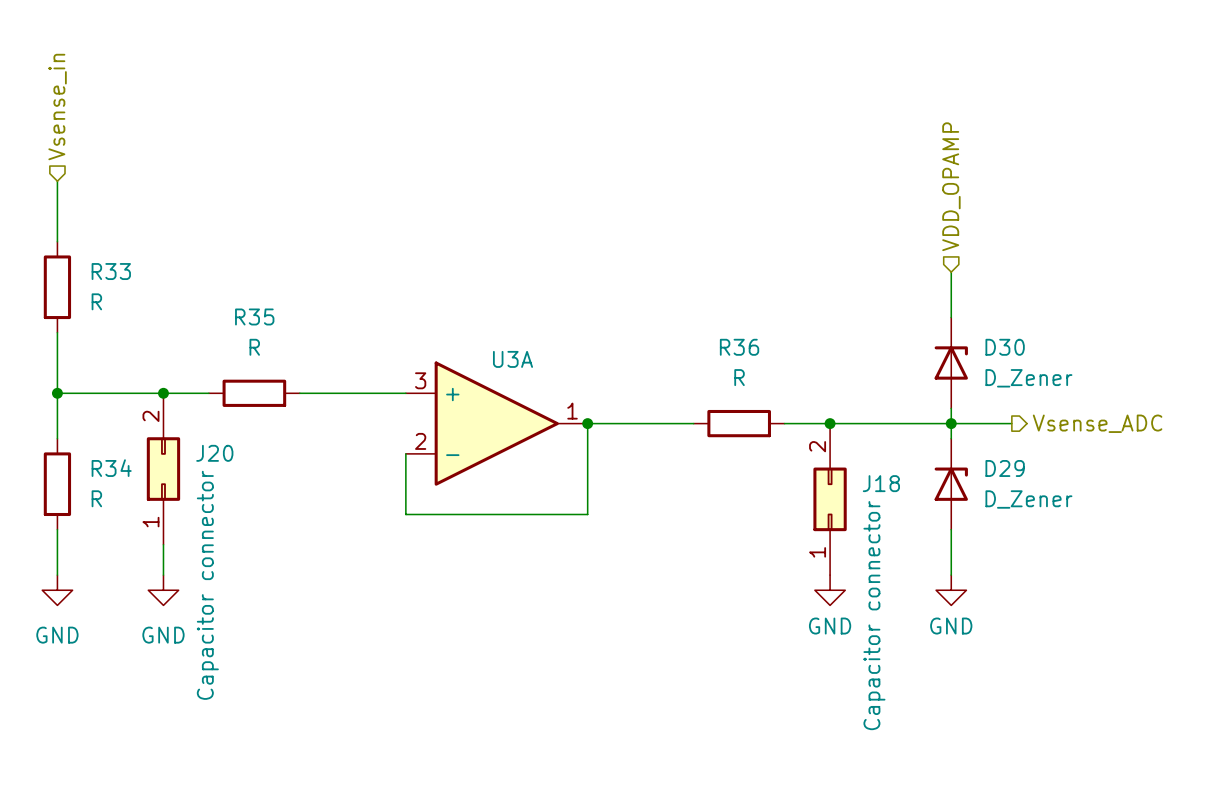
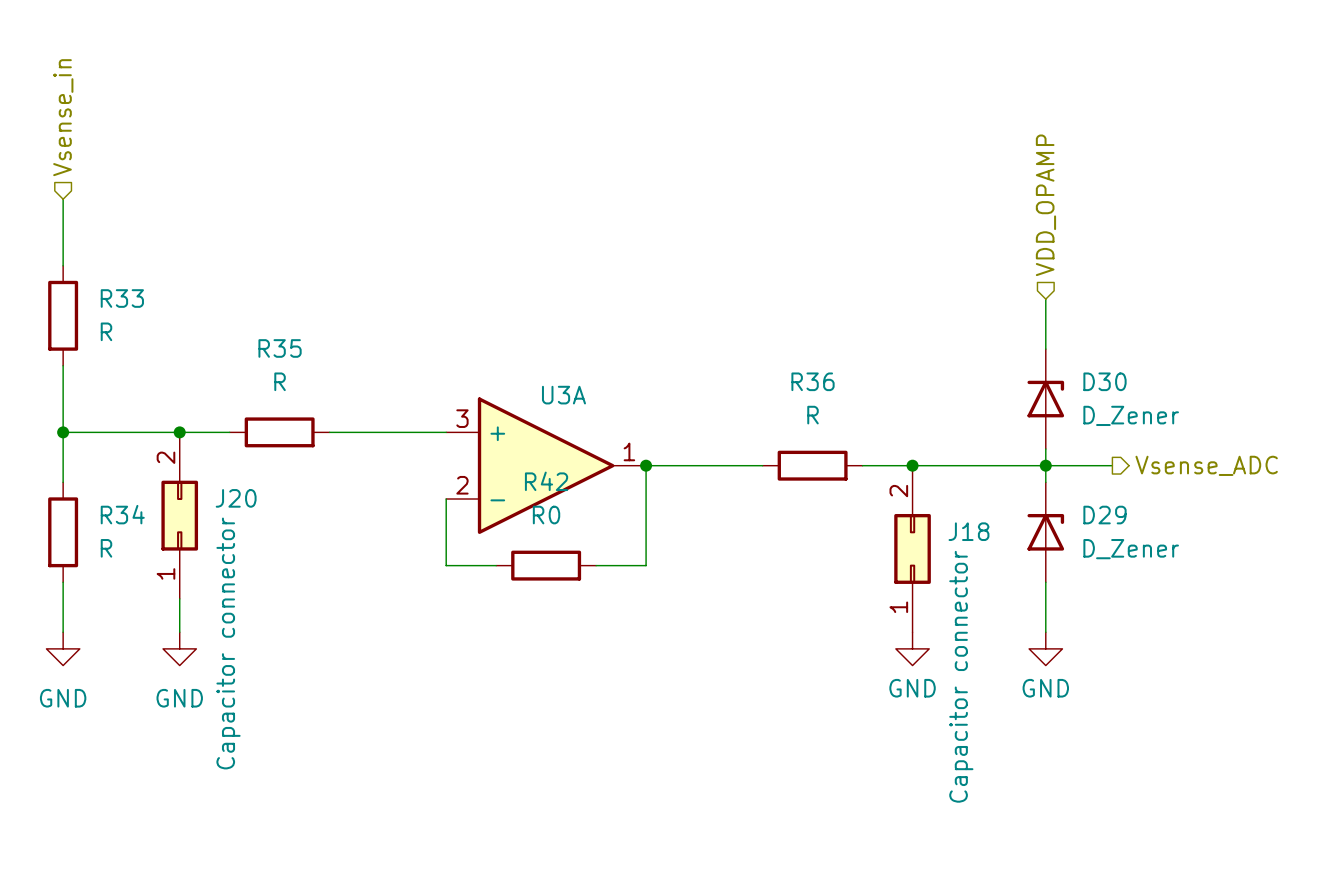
wire: (451, 514) (542, 514) -> none
R42: none -> R0 (546, 565)

